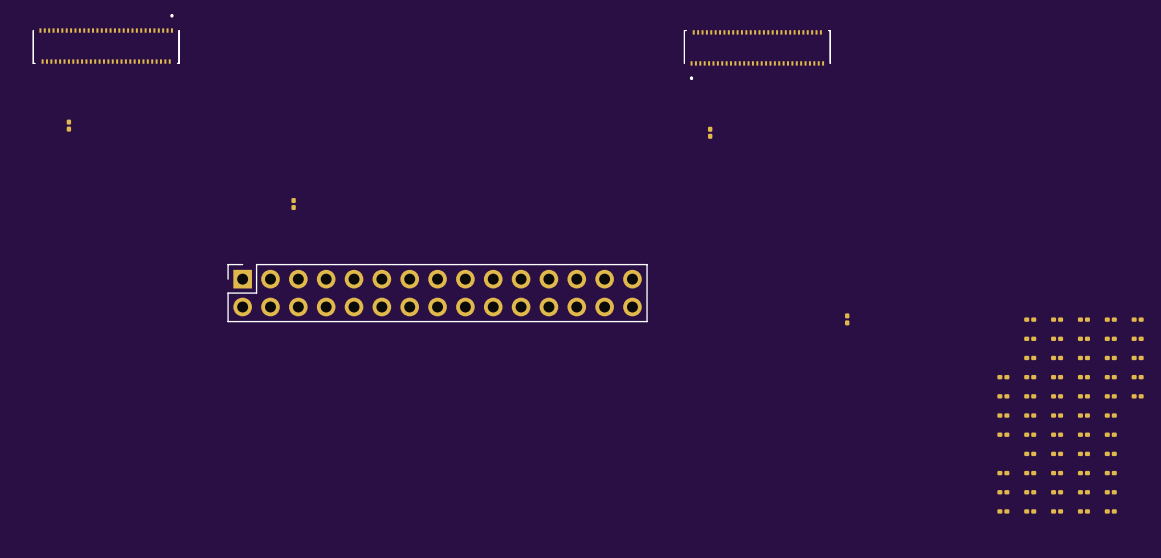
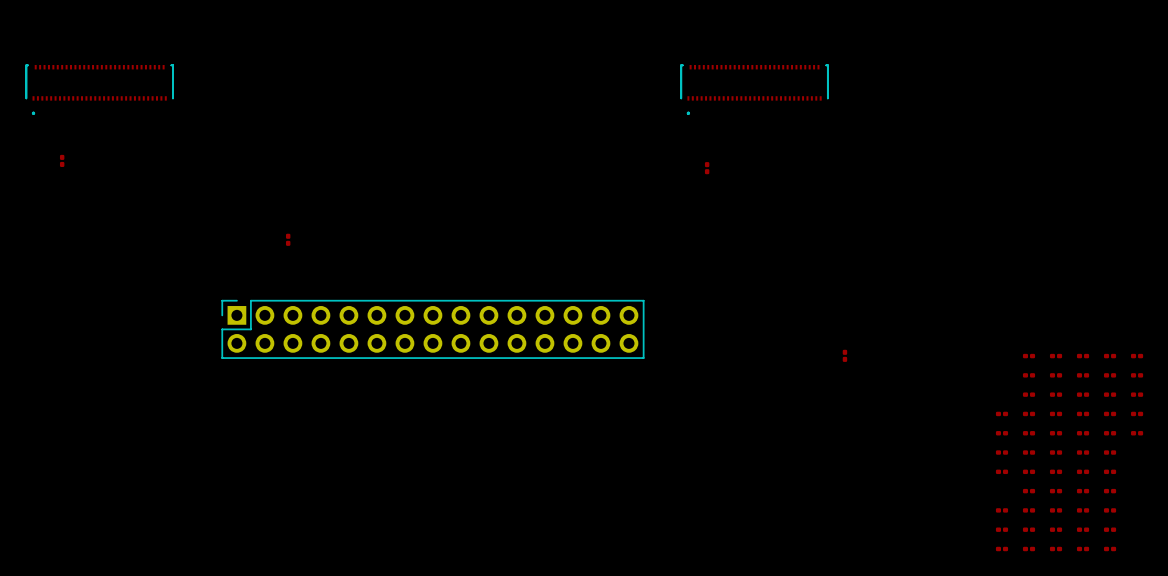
part rotation: 0° (106, 39) -> 180° (99, 89)

